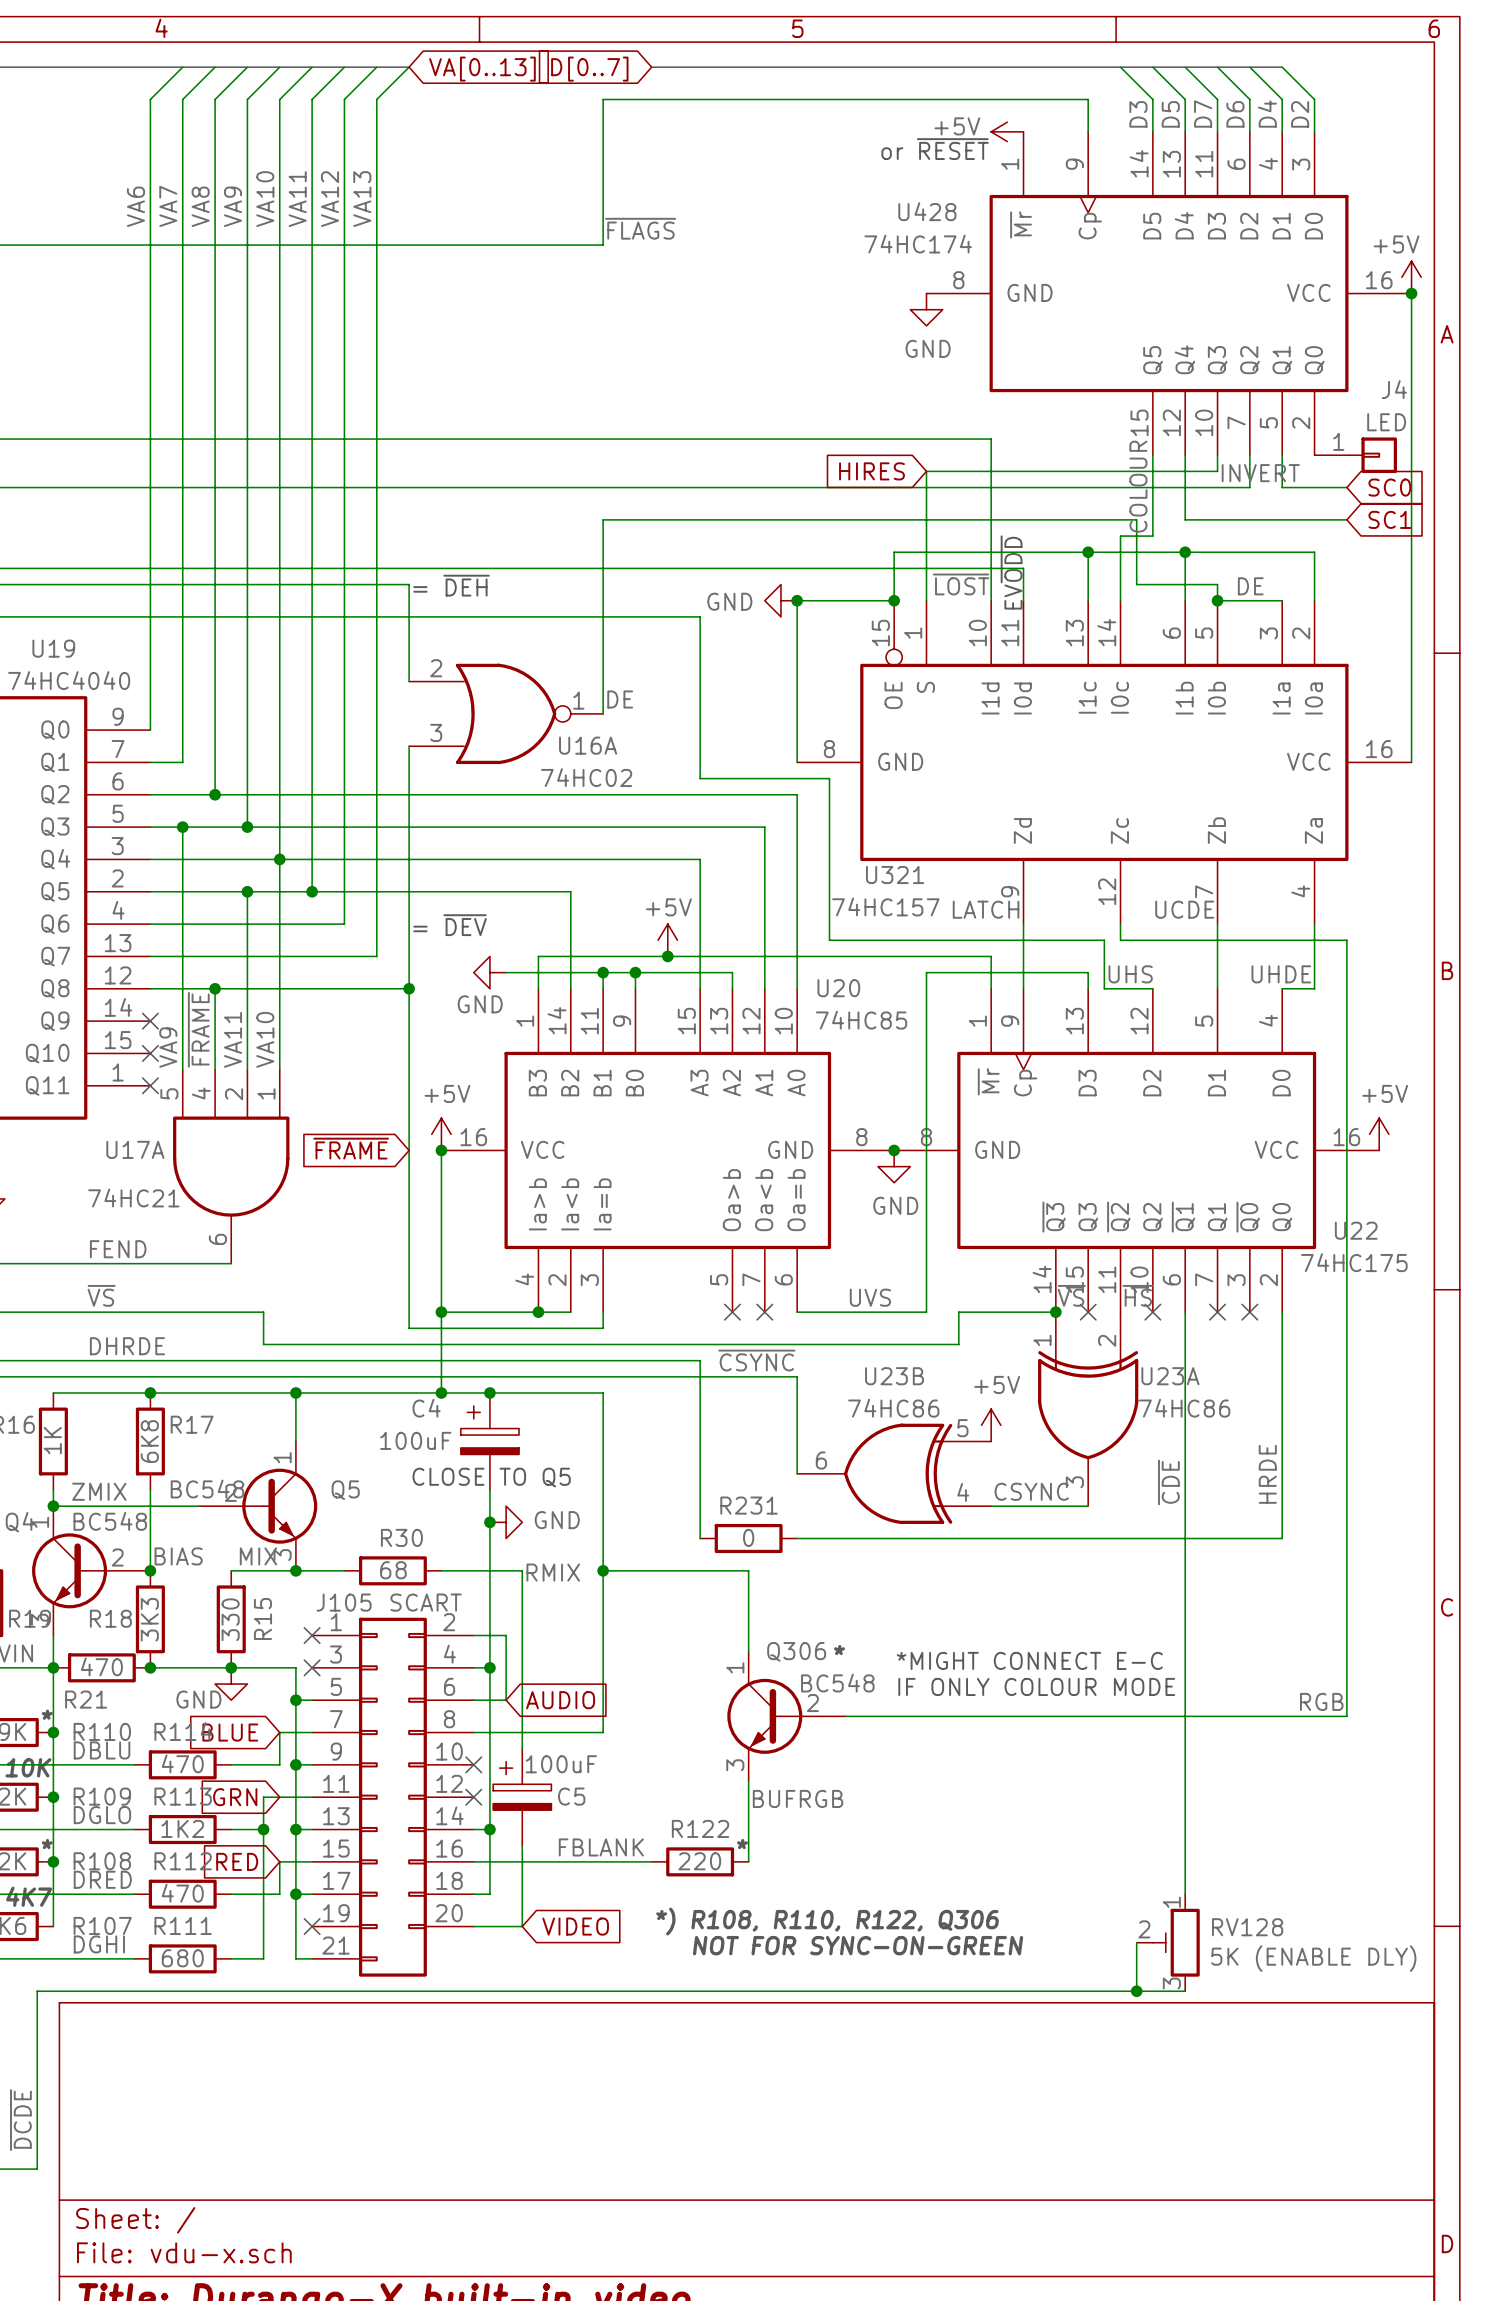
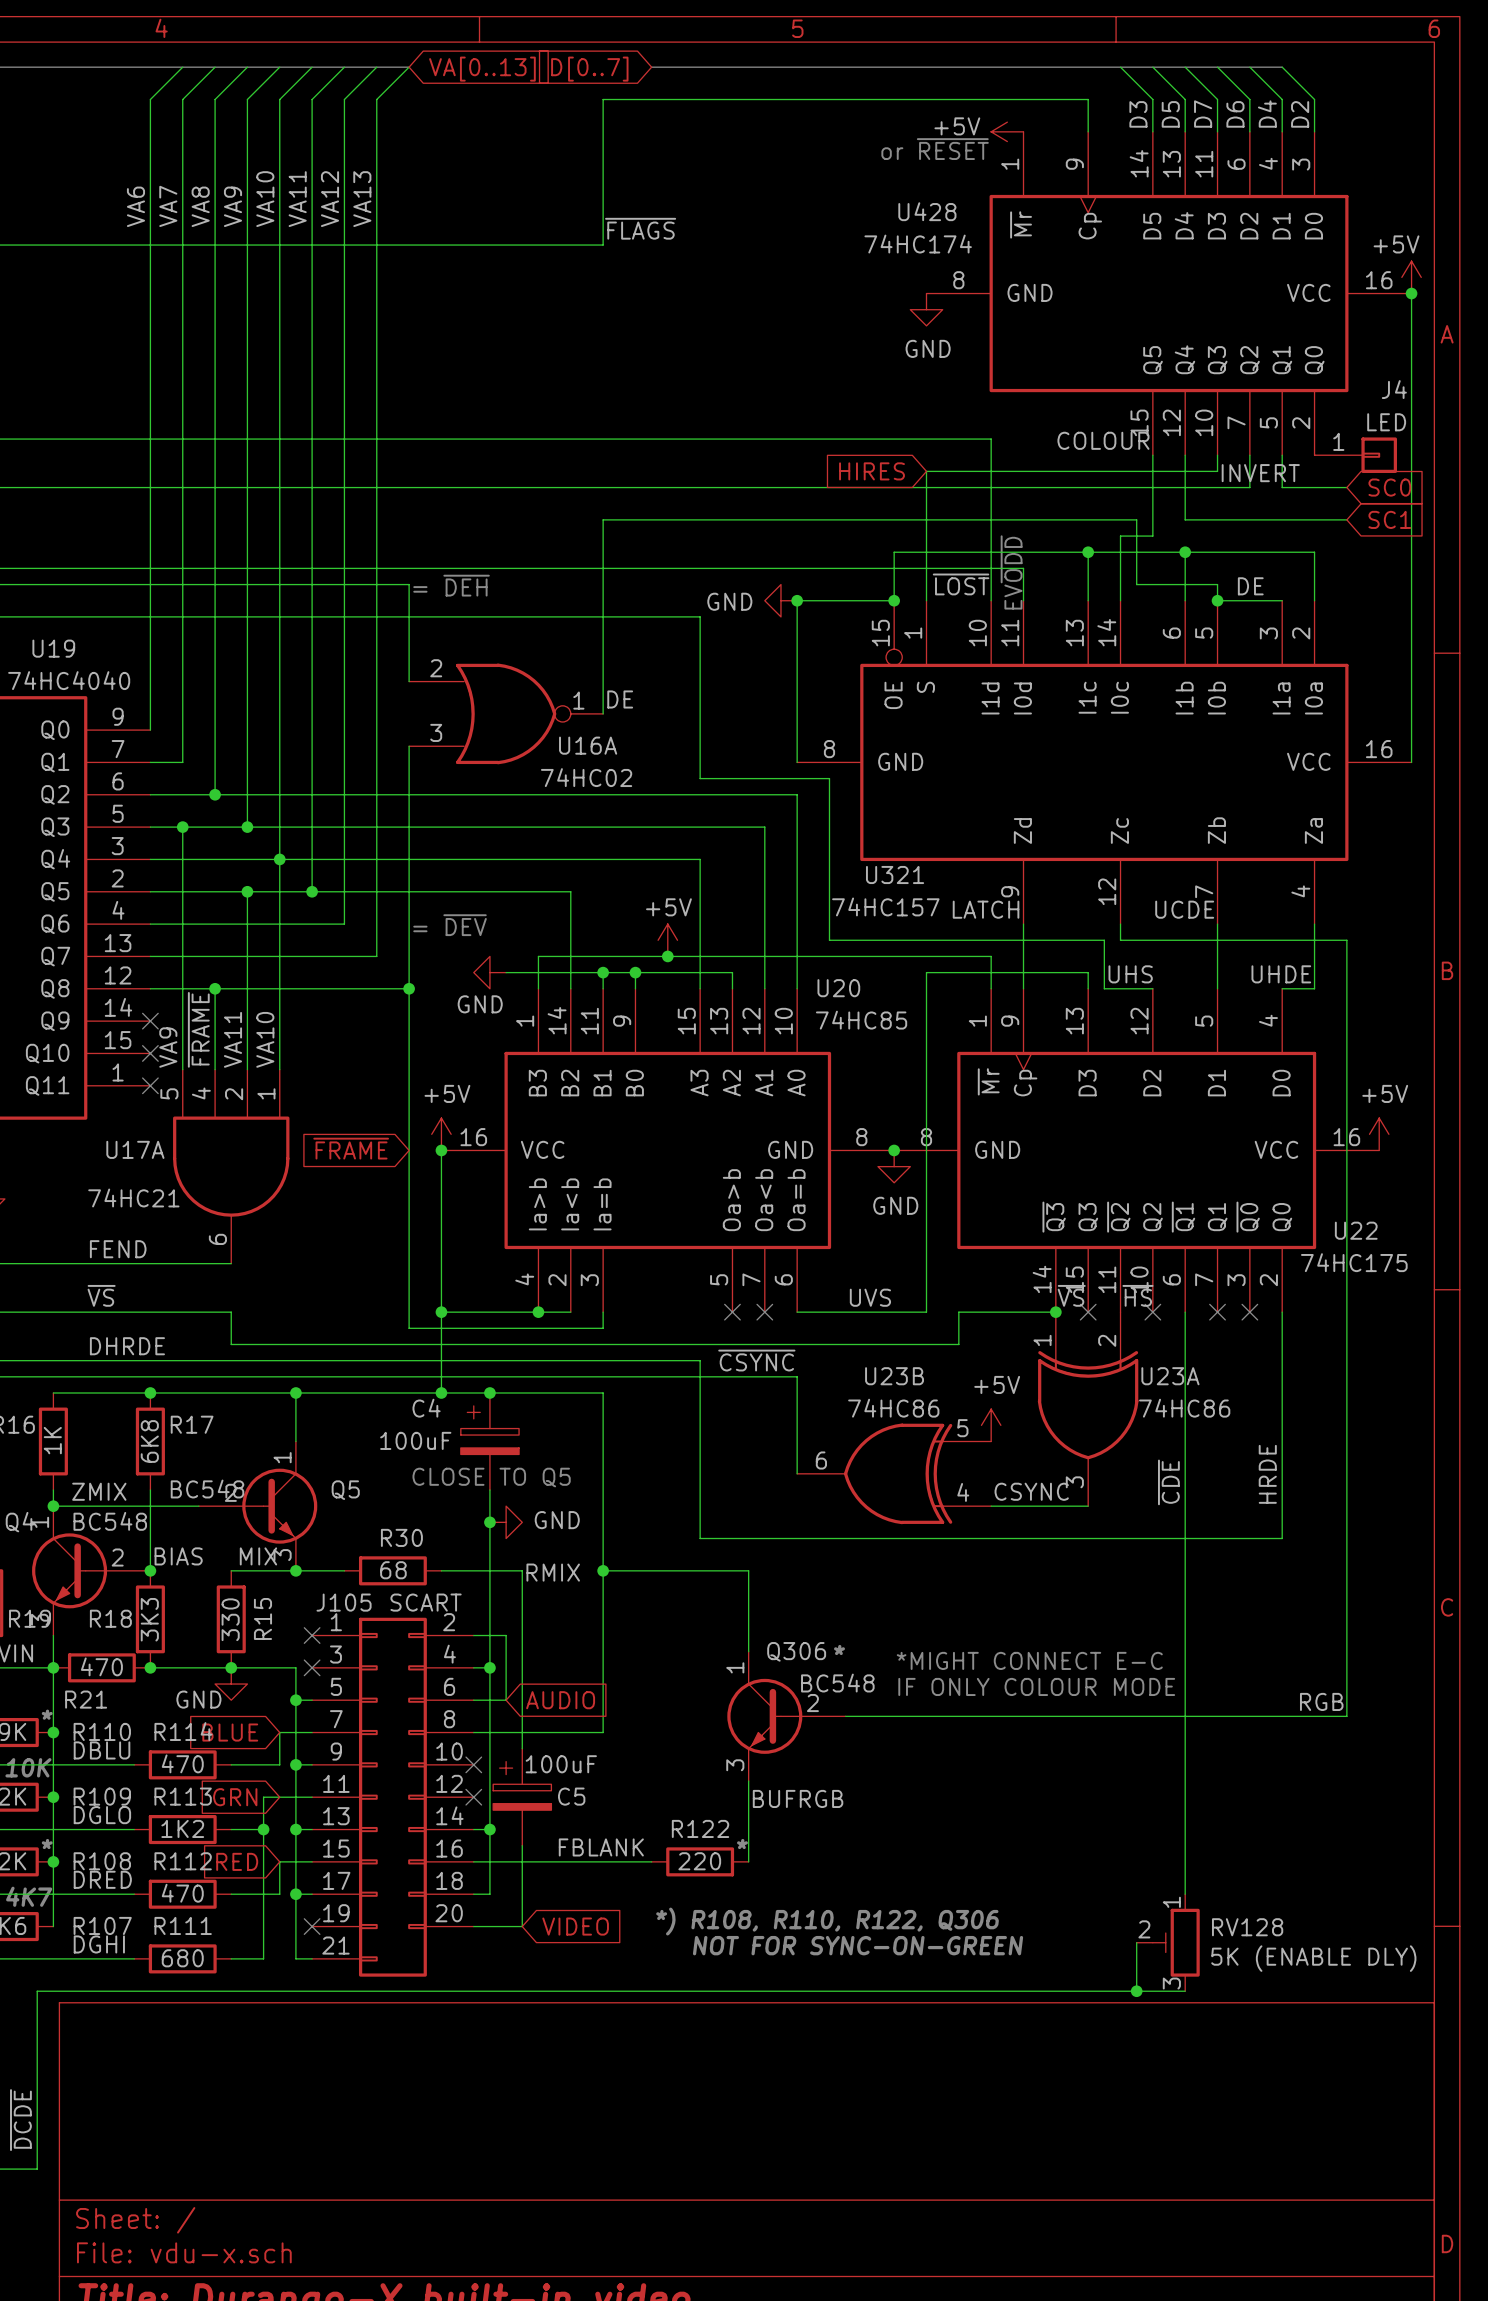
label rotation: 0° (1138, 486) -> 90° clockwise (1103, 440)
wire: (231, 1312) (263, 1312) (263, 1344) -> (231, 1312) (231, 1344) (263, 1344)
wire: none -> (700, 1538) (797, 1538)
R231: 0 (748, 1538) -> none

